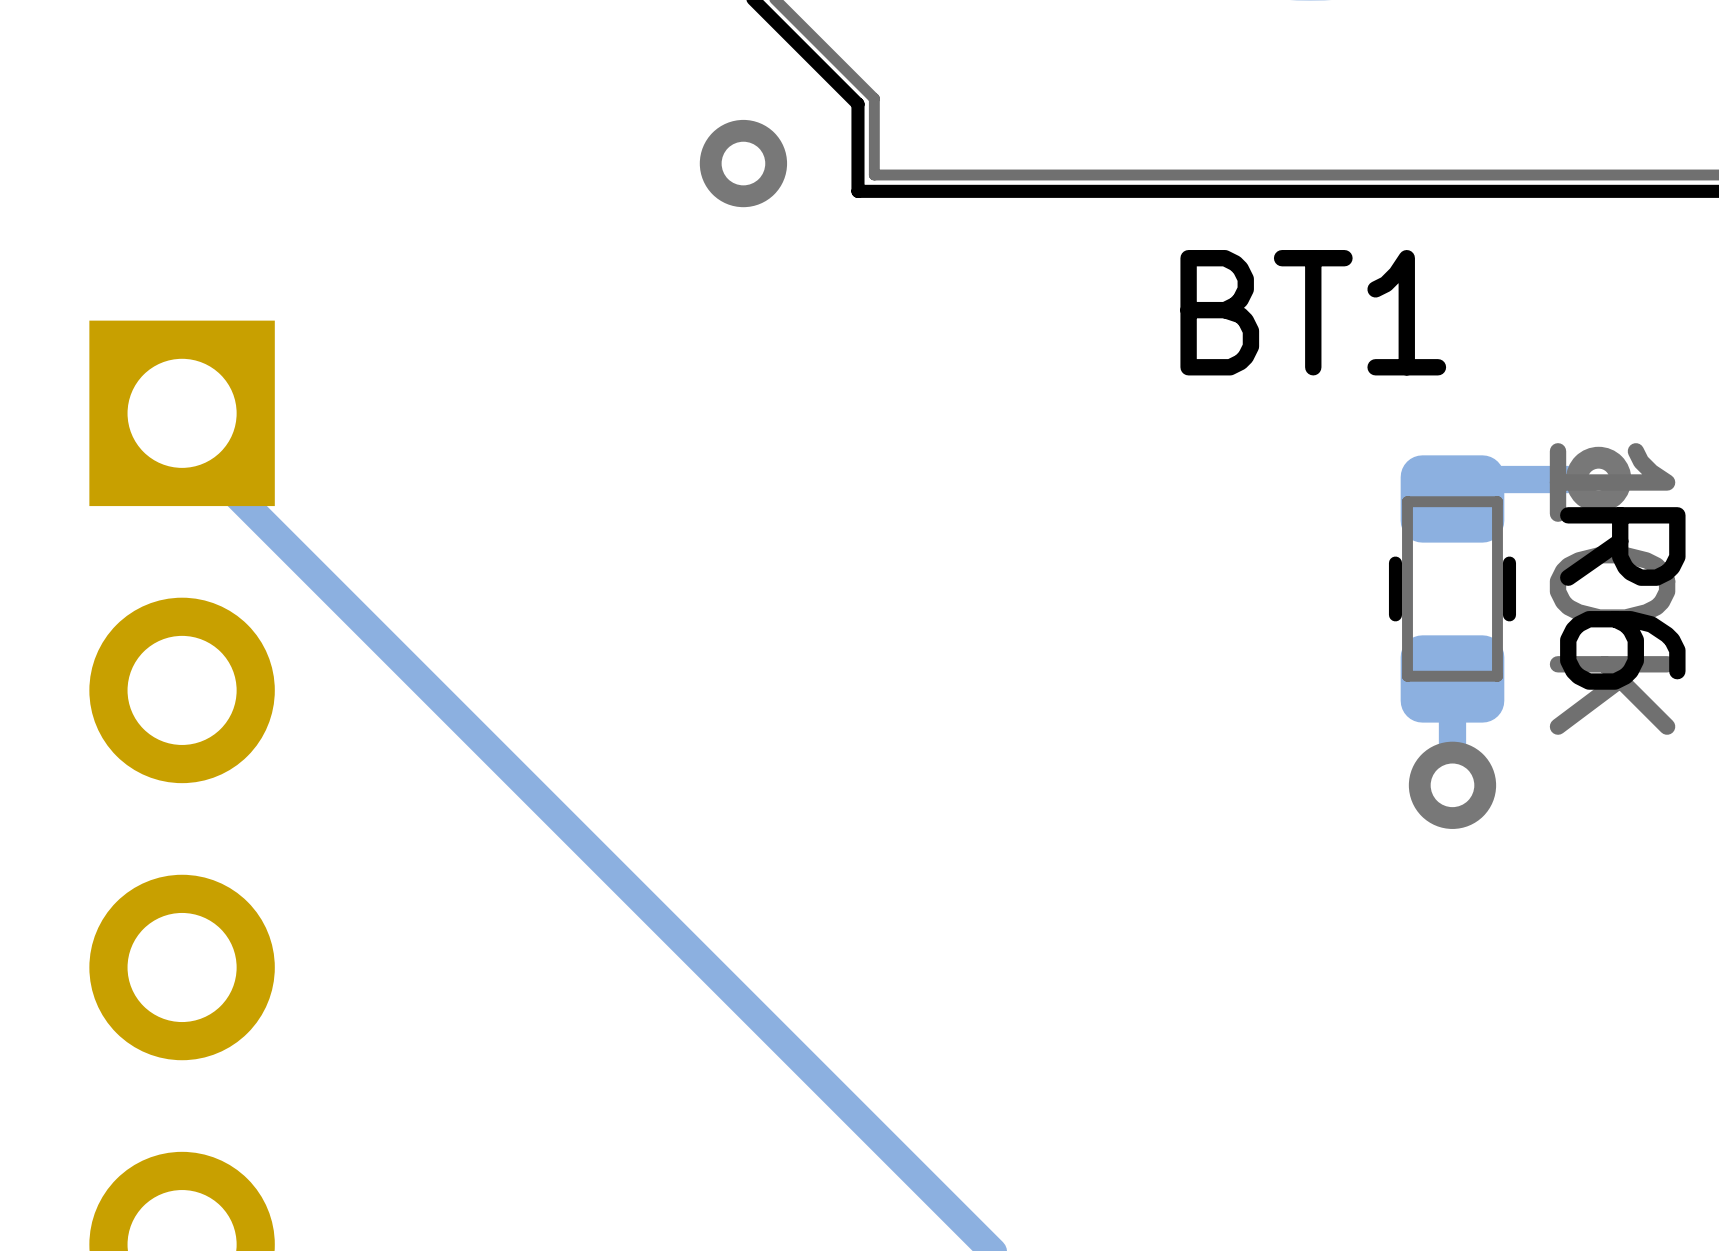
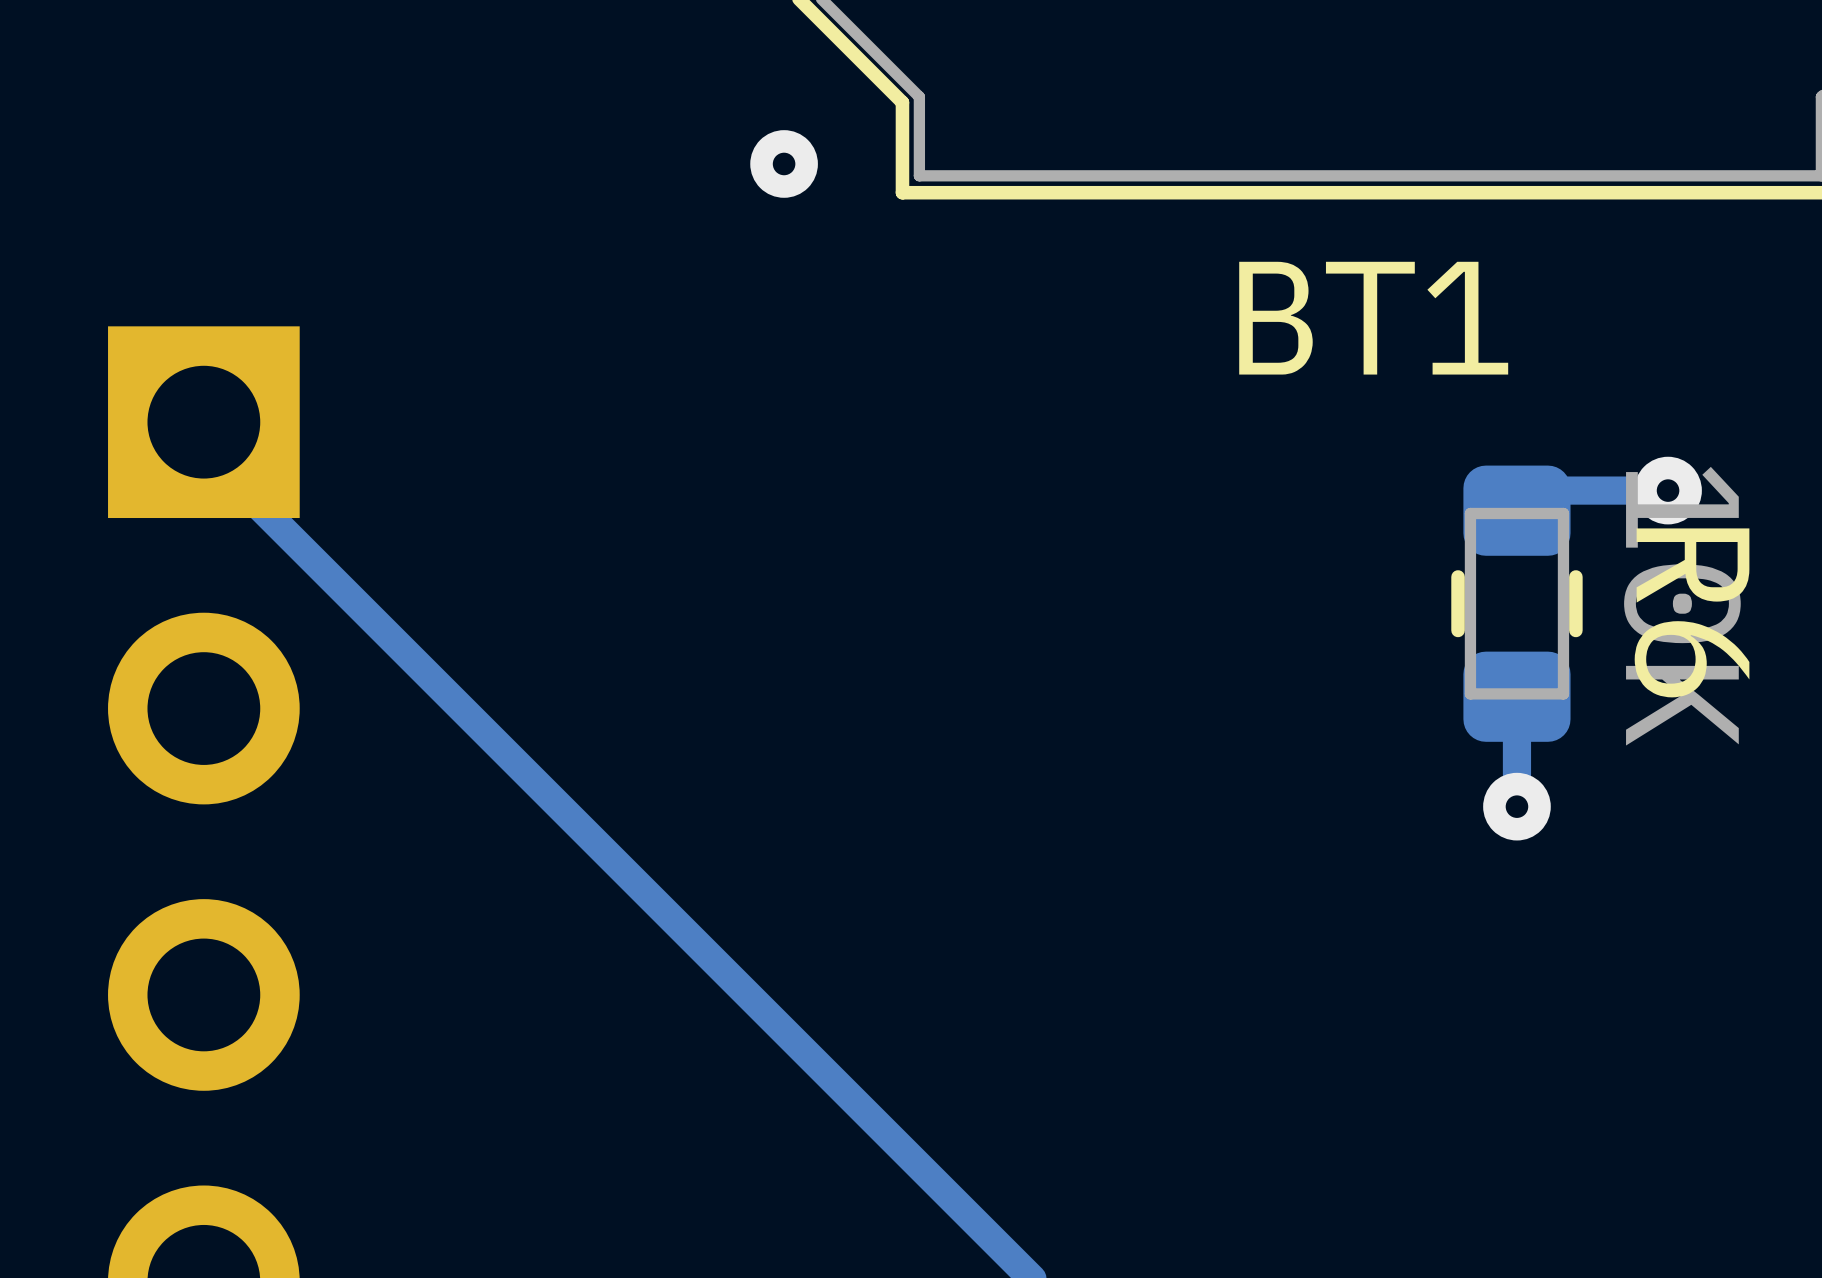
via size: [699, 119, 788, 208] -> [750, 130, 818, 198]
via size: [1408, 741, 1497, 829] -> [1483, 772, 1551, 841]

